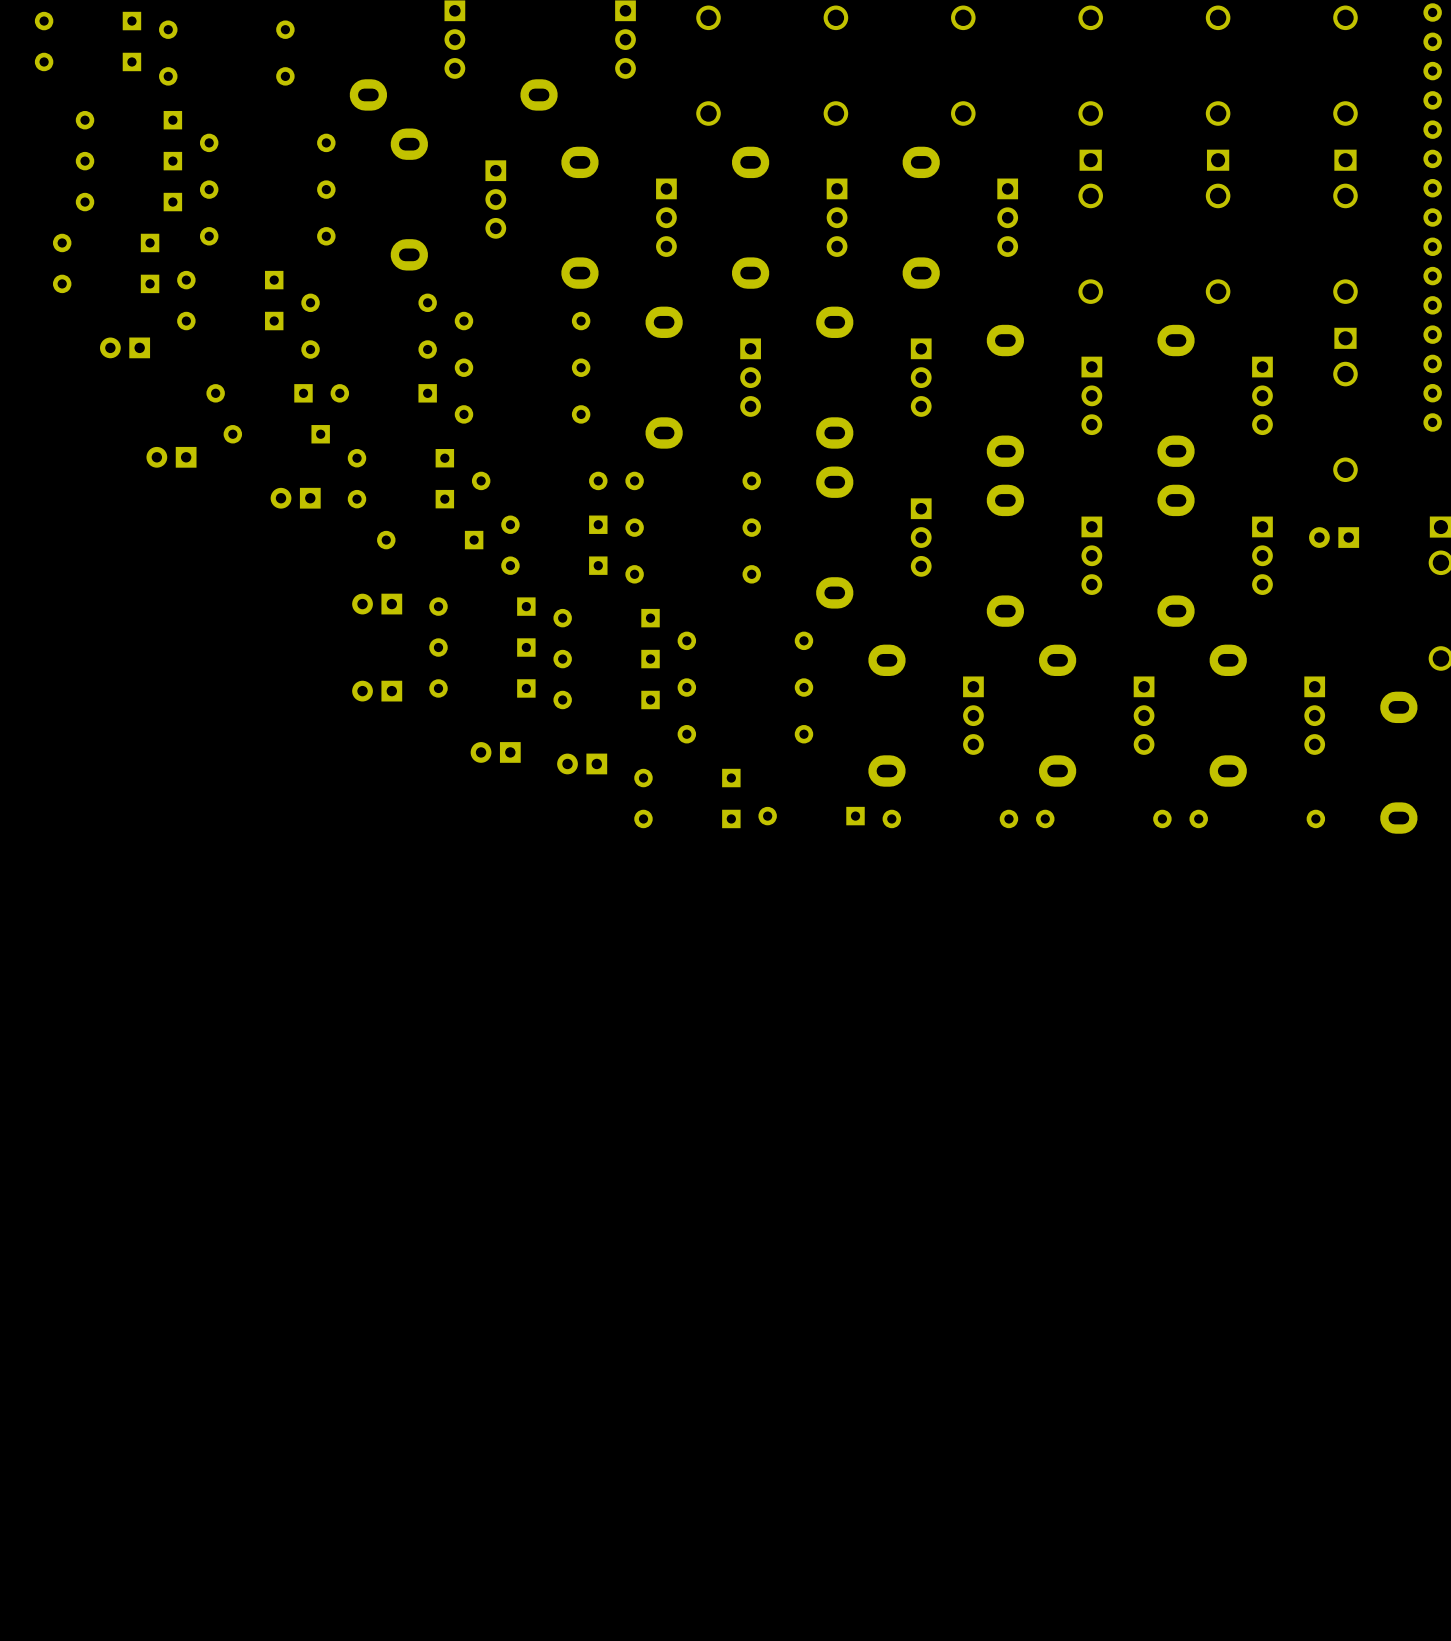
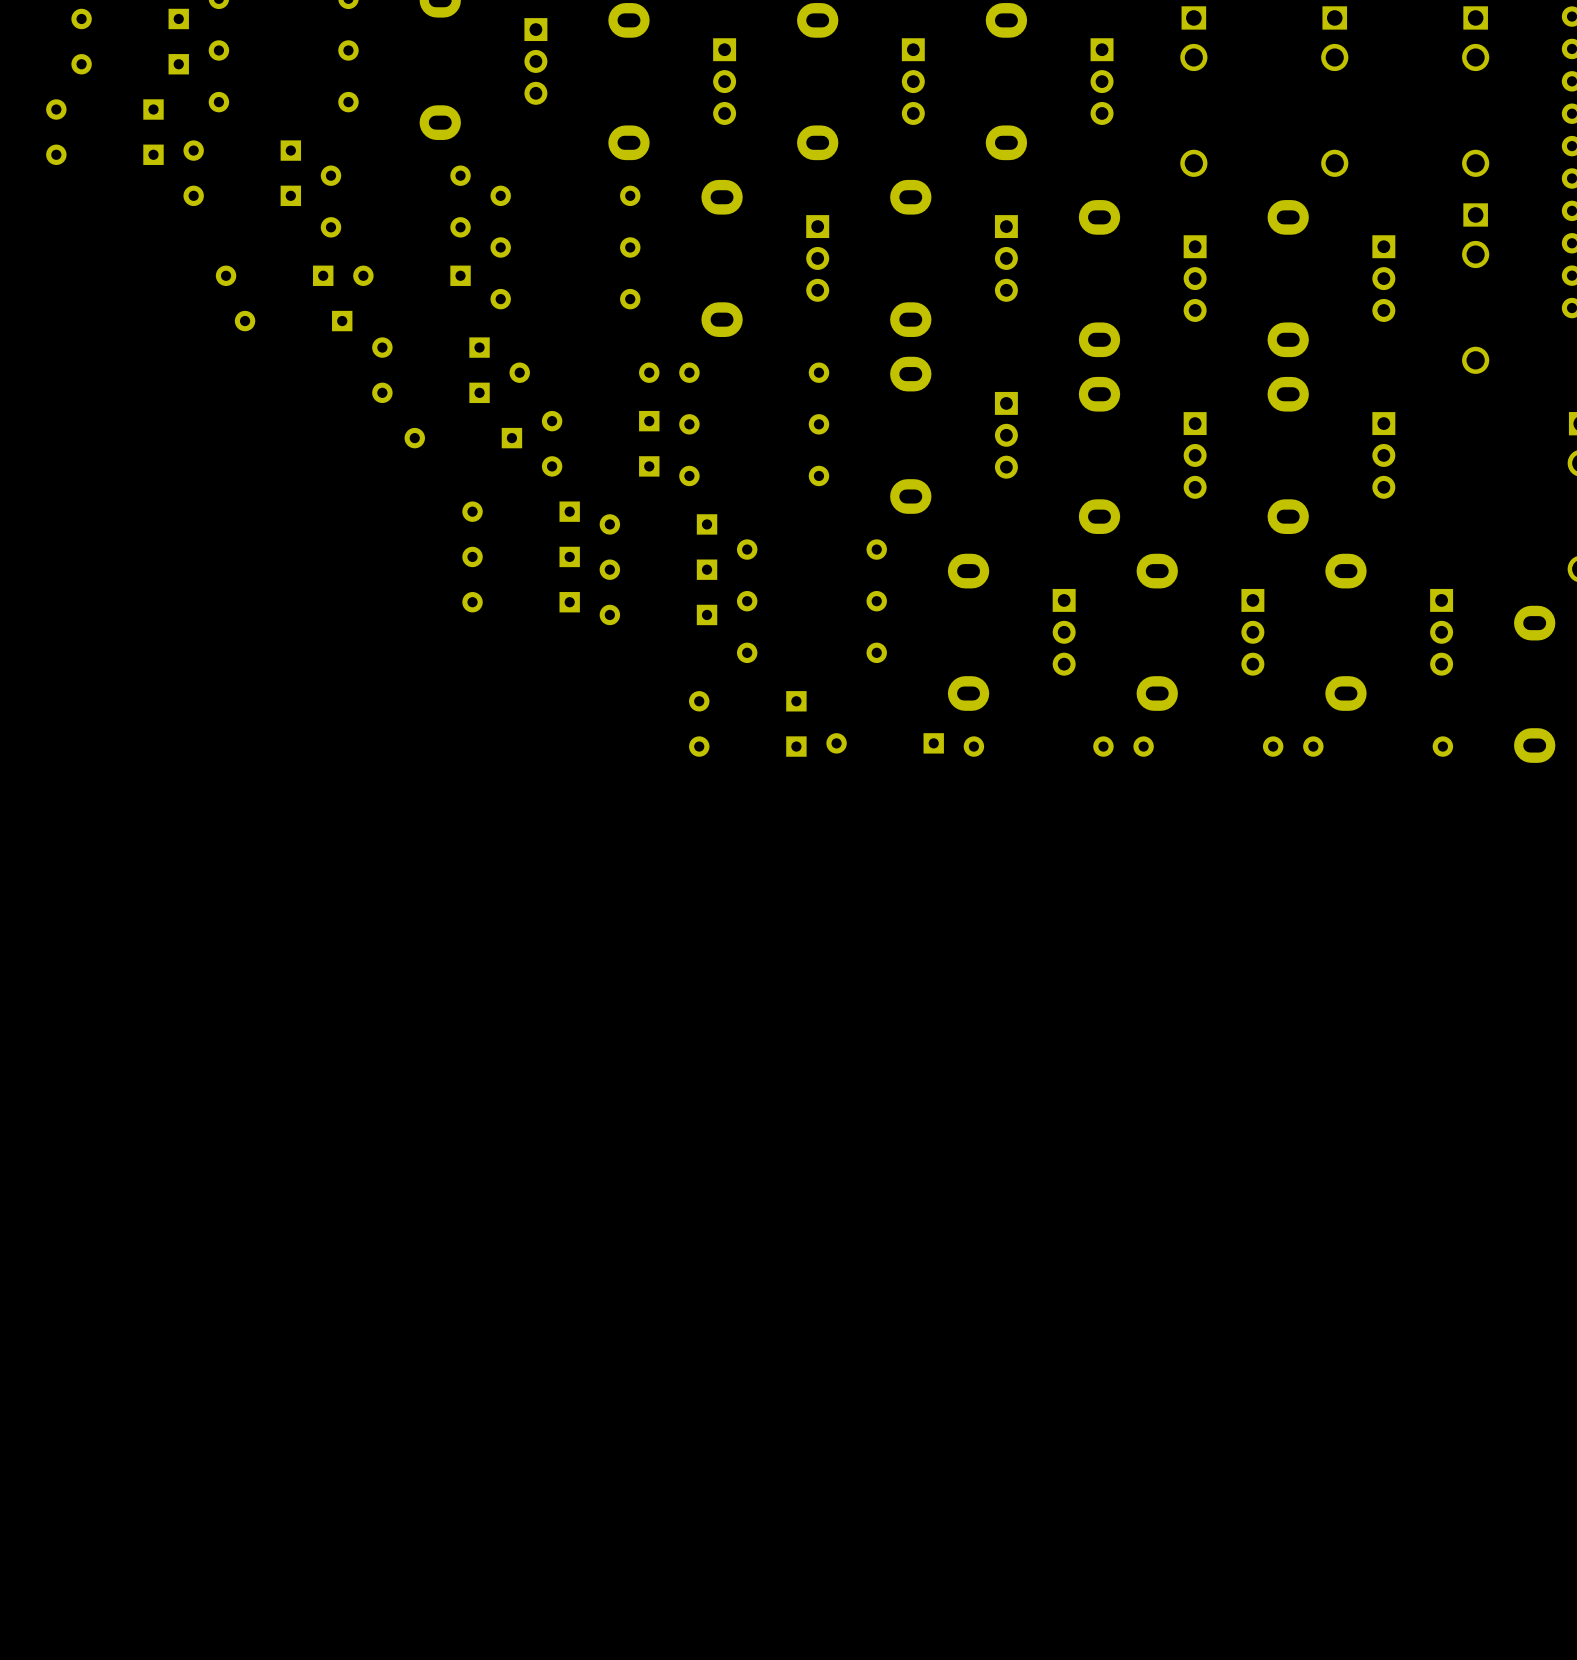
part: (125, 347) -> none
part: (171, 457) -> none
part: (295, 498) -> none
part: (1334, 537) -> none
part: (377, 604) -> none
part: (377, 691) -> none
part: (495, 752) -> none
part: (582, 763) -> none

